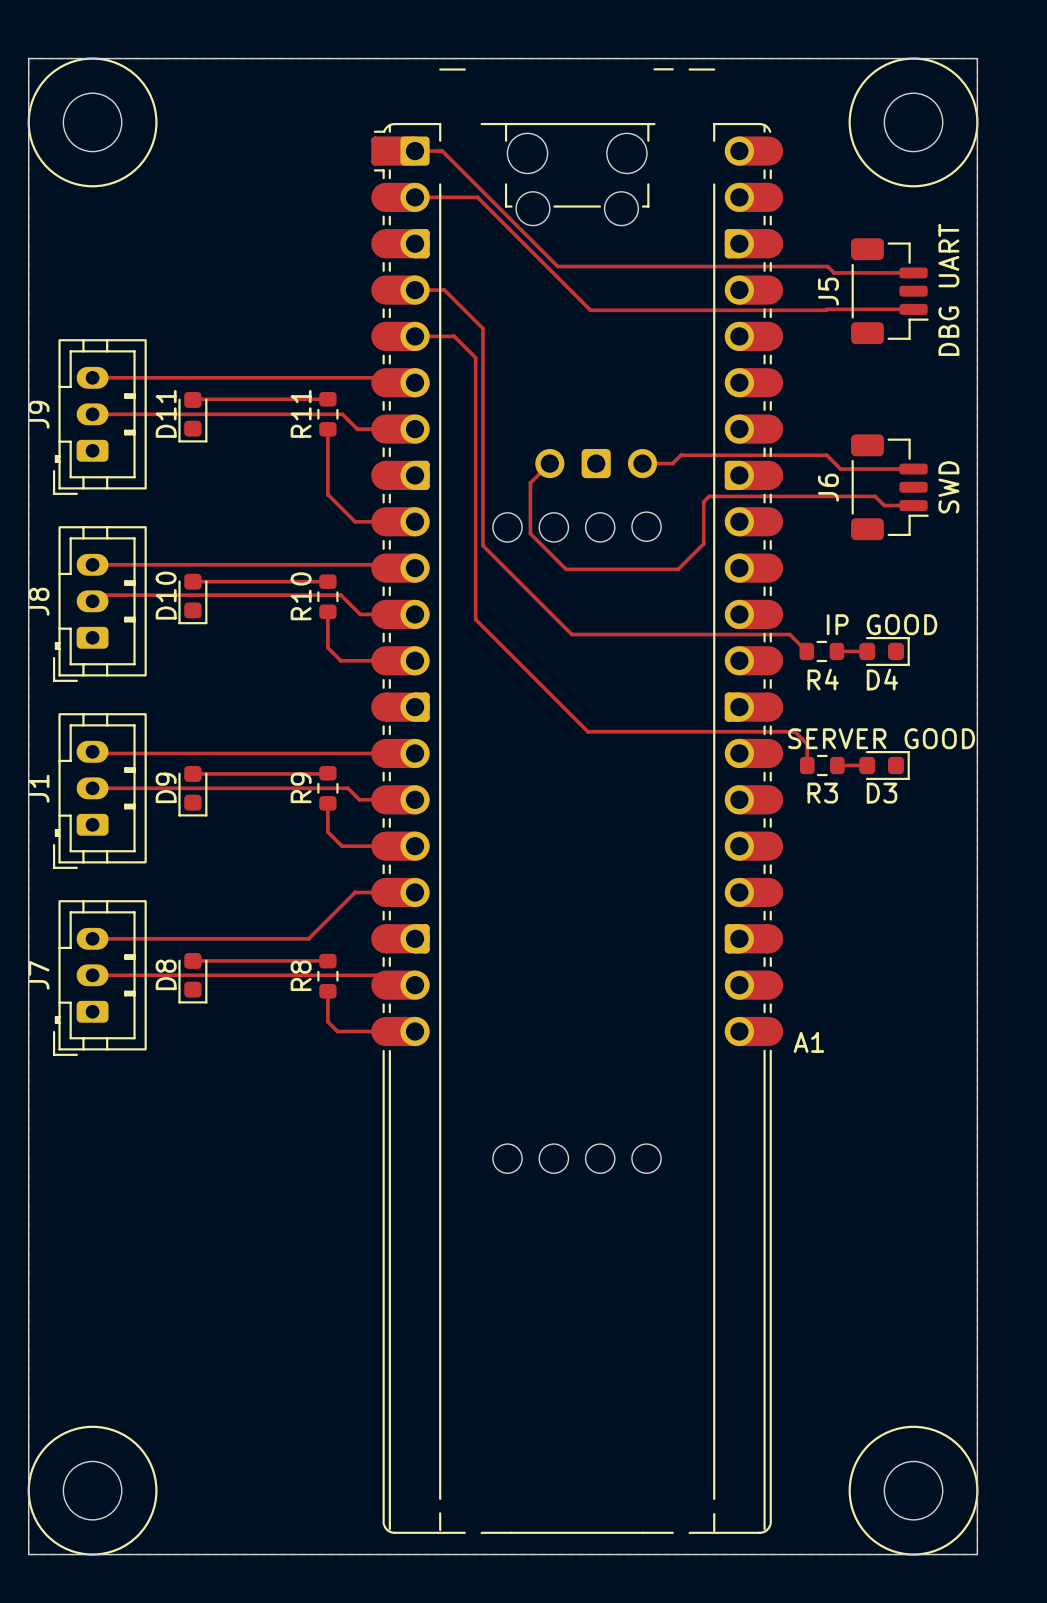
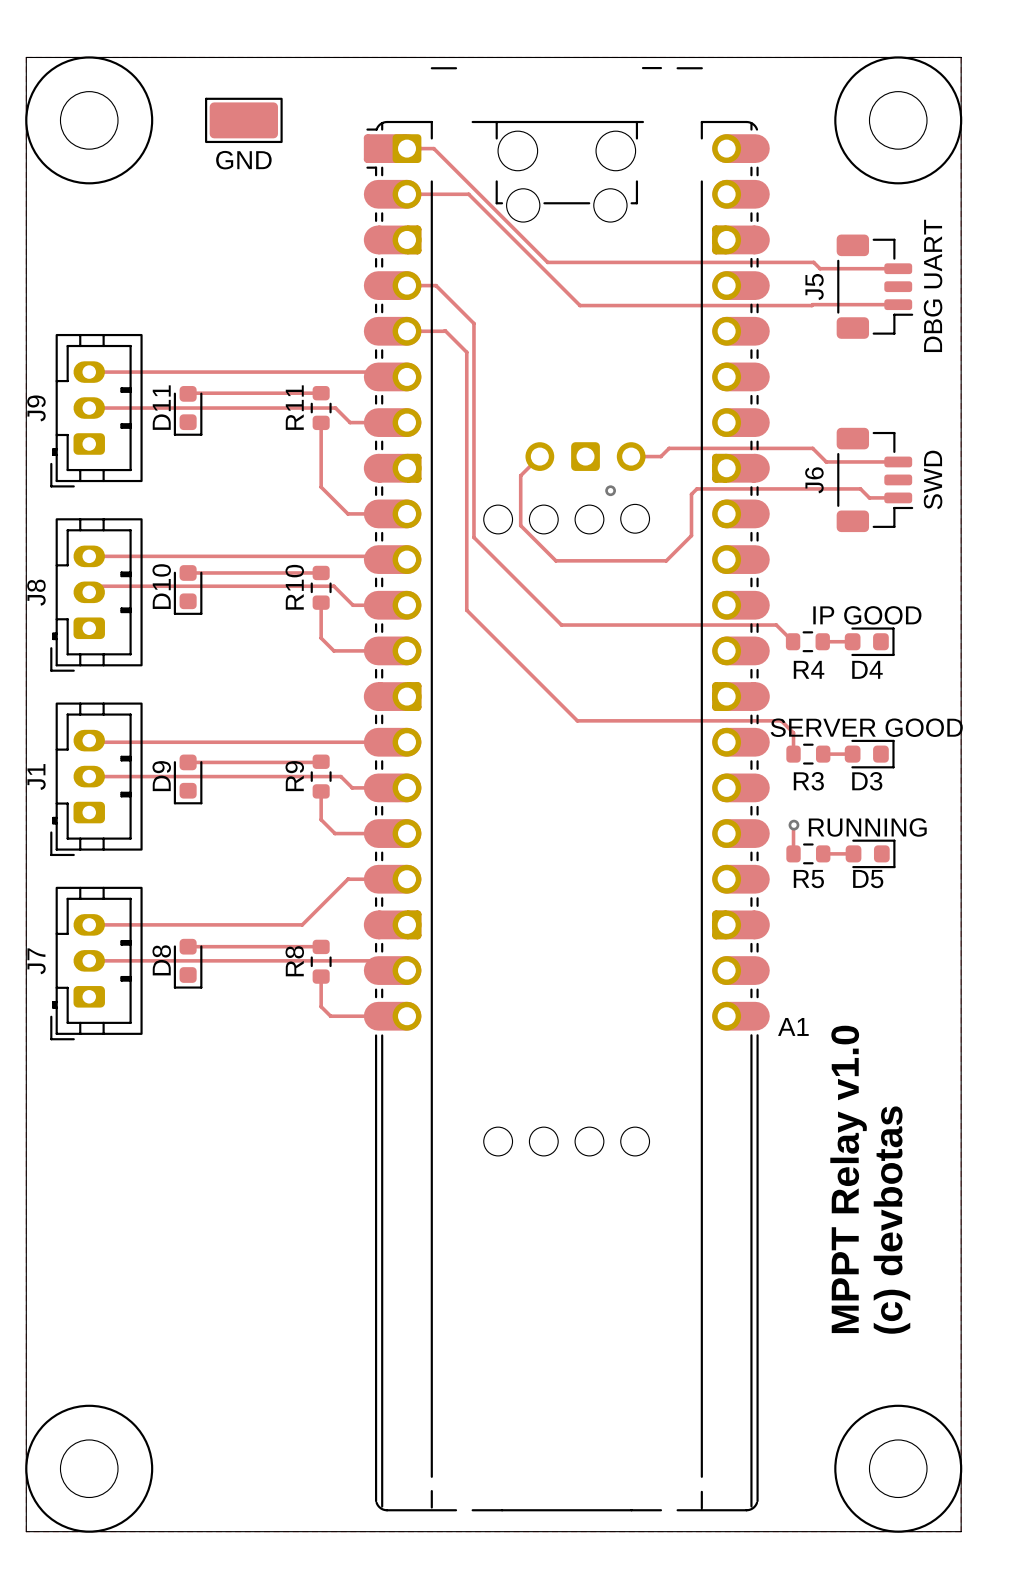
part: none -> GND (243, 120)
via: none -> (610, 490)
track: none -> (793, 825) (793, 853)
via: none -> (793, 825)
R5: none -> (808, 853)
track: none -> (823, 853) (853, 853)
D5: none -> RUNNING (870, 853)
text: none -> MPPT Relay v1.0 (848, 1179)
text: none -> (c) devbotas (891, 1220)

